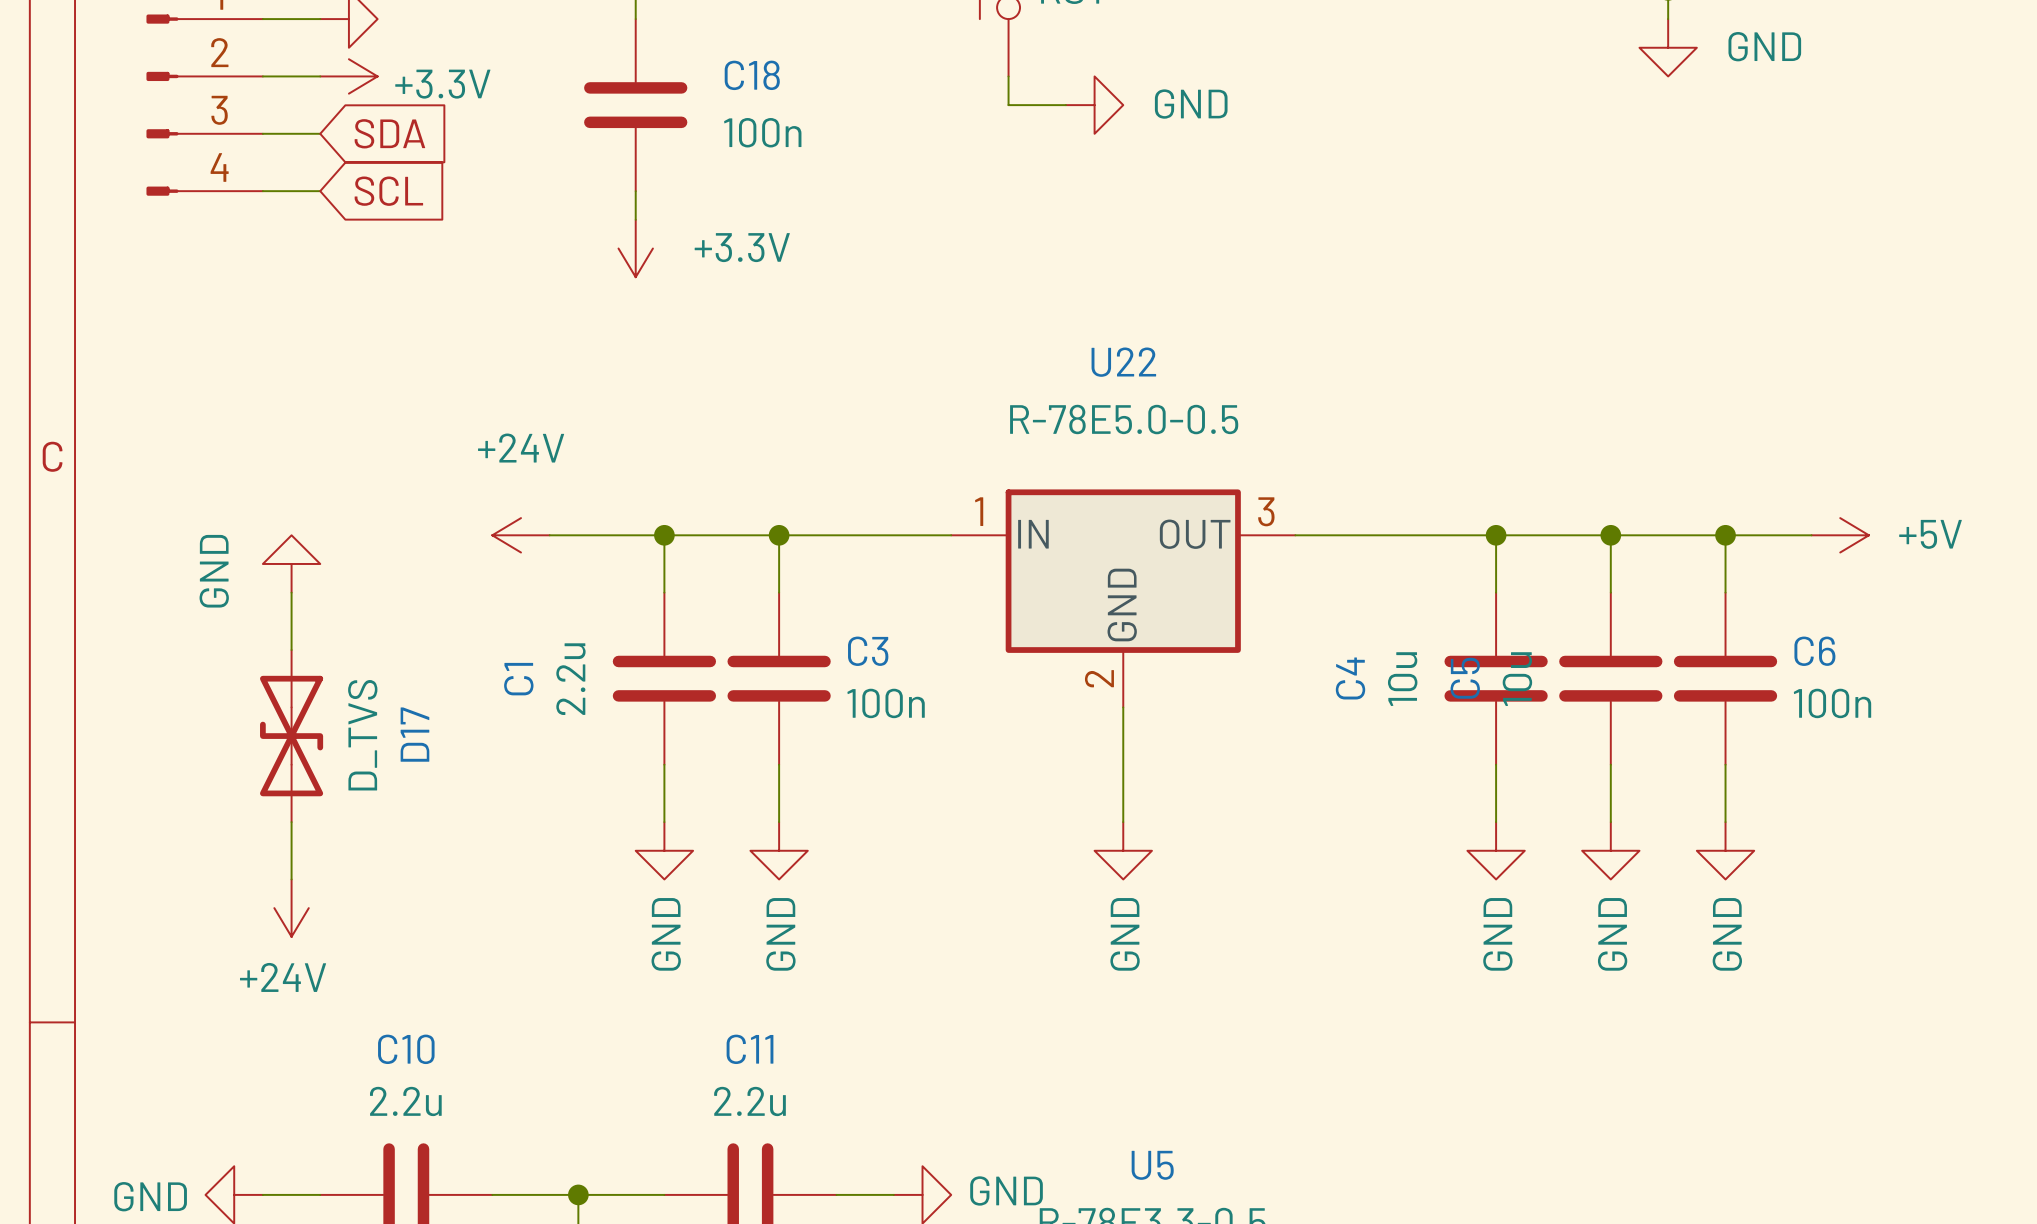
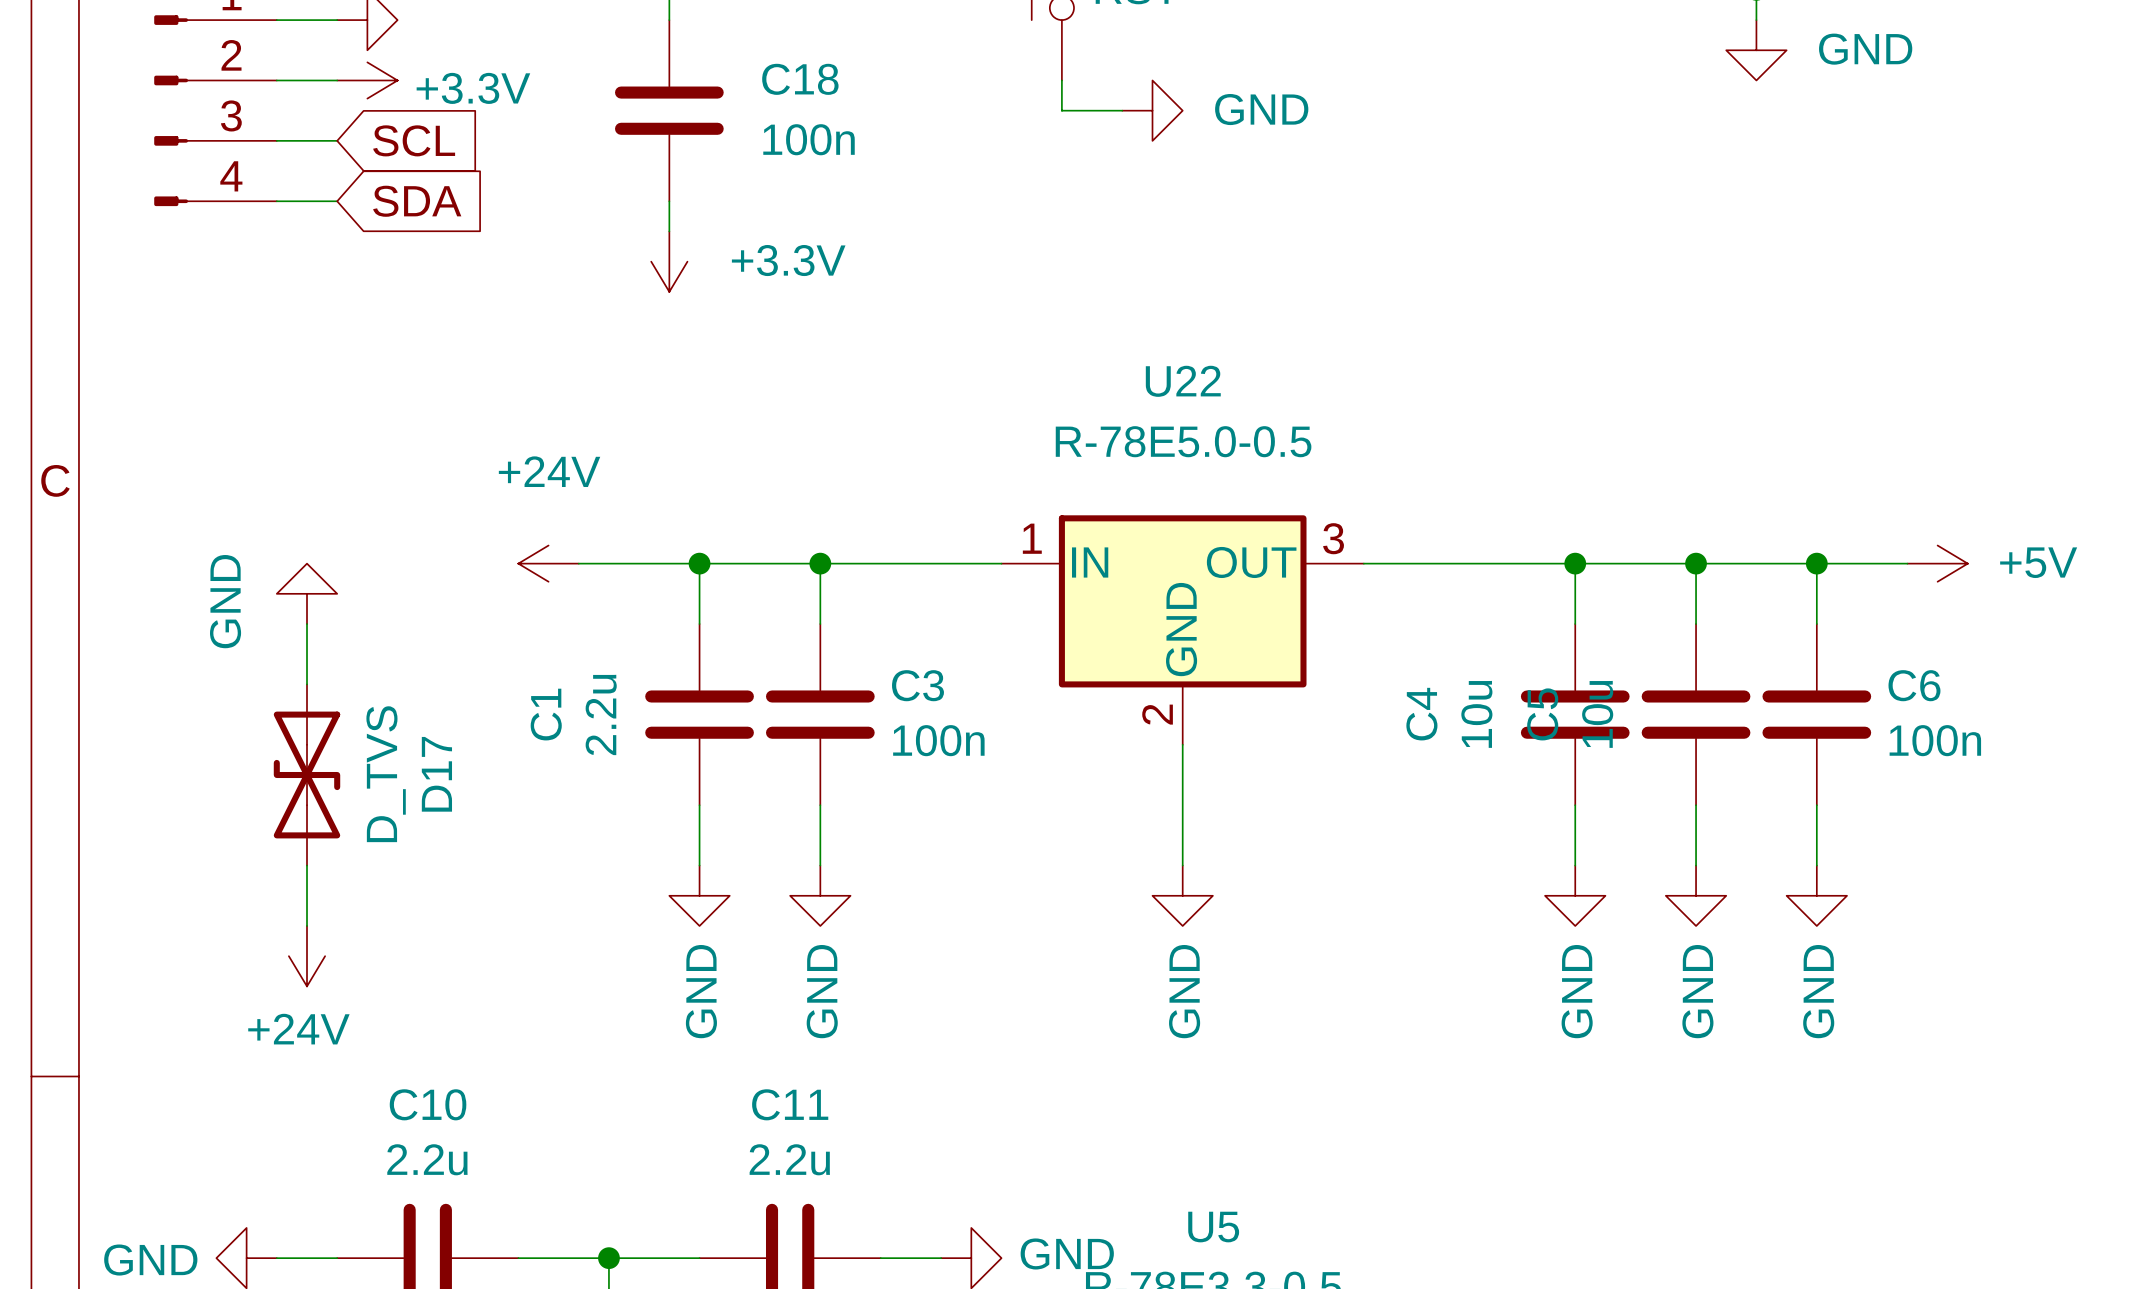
global label: SDA (389, 133) -> SCL (414, 140)
global label: SCL (388, 191) -> SDA (417, 201)

